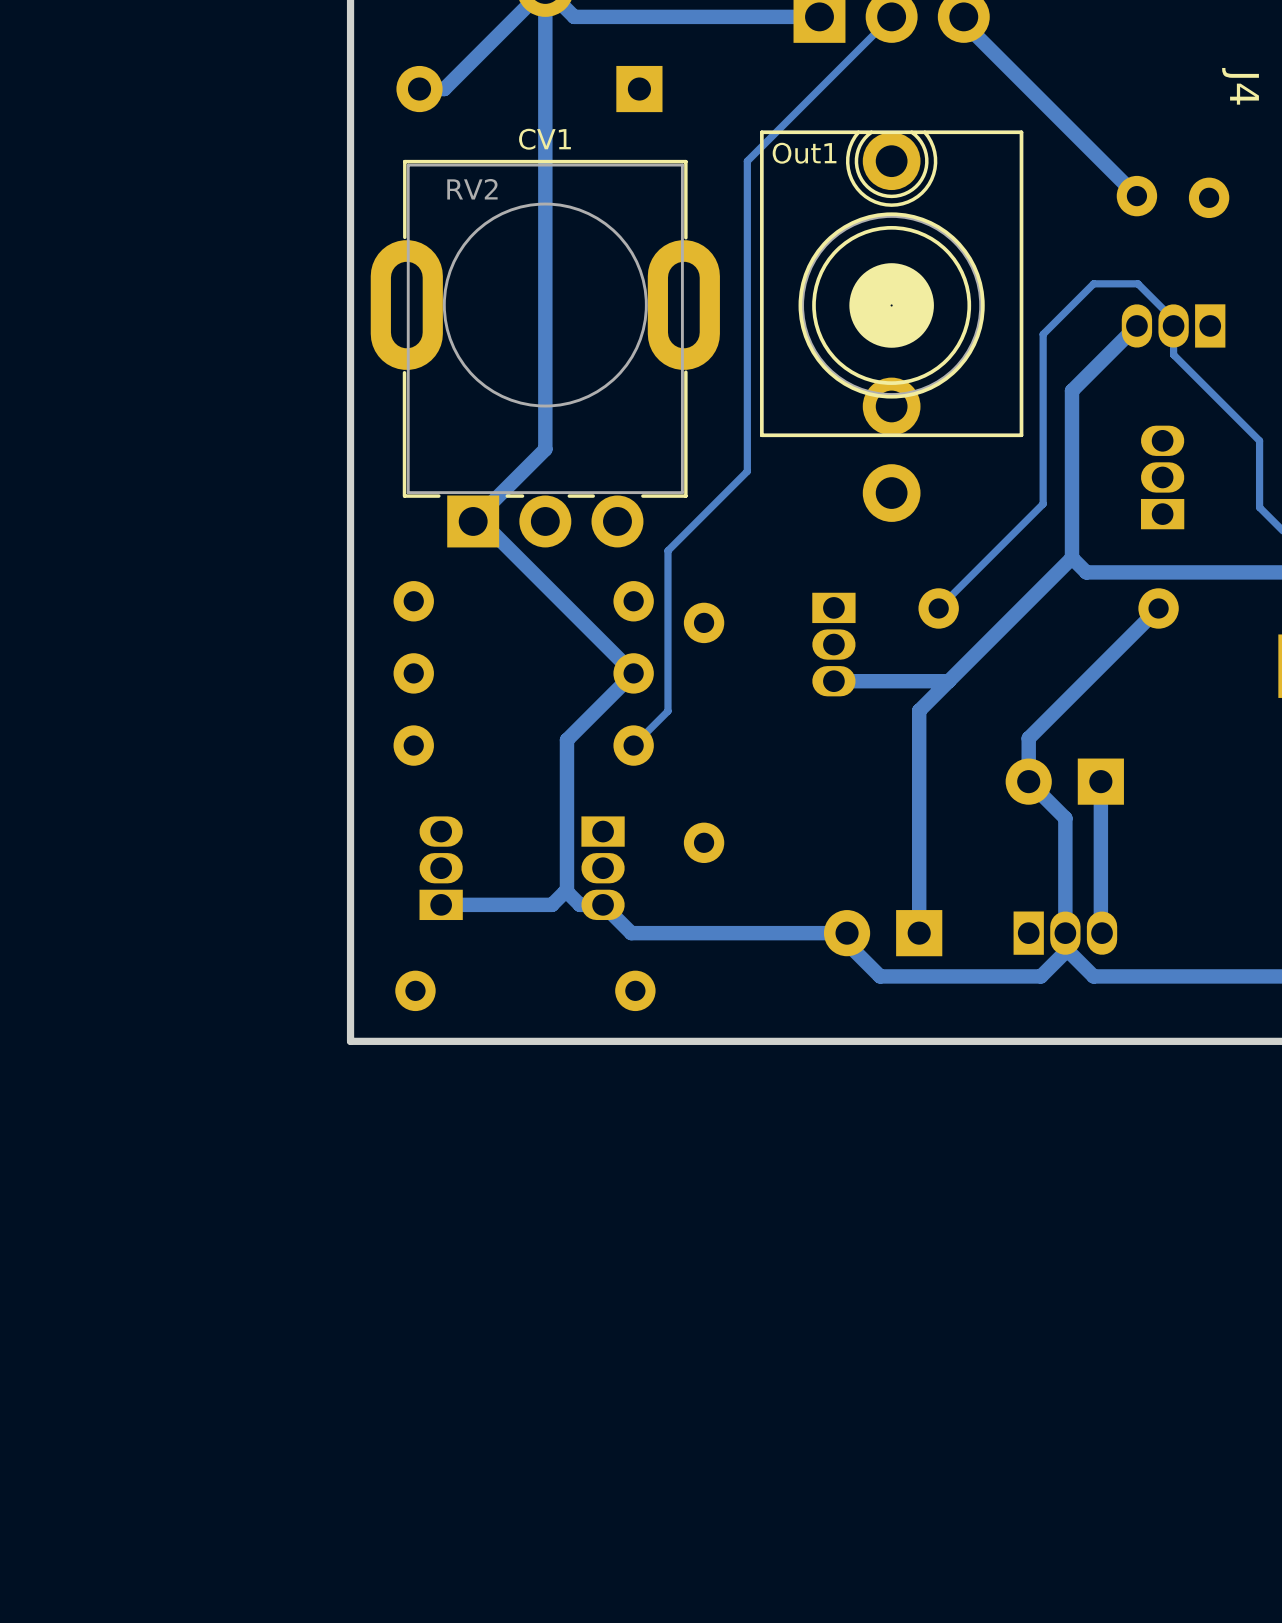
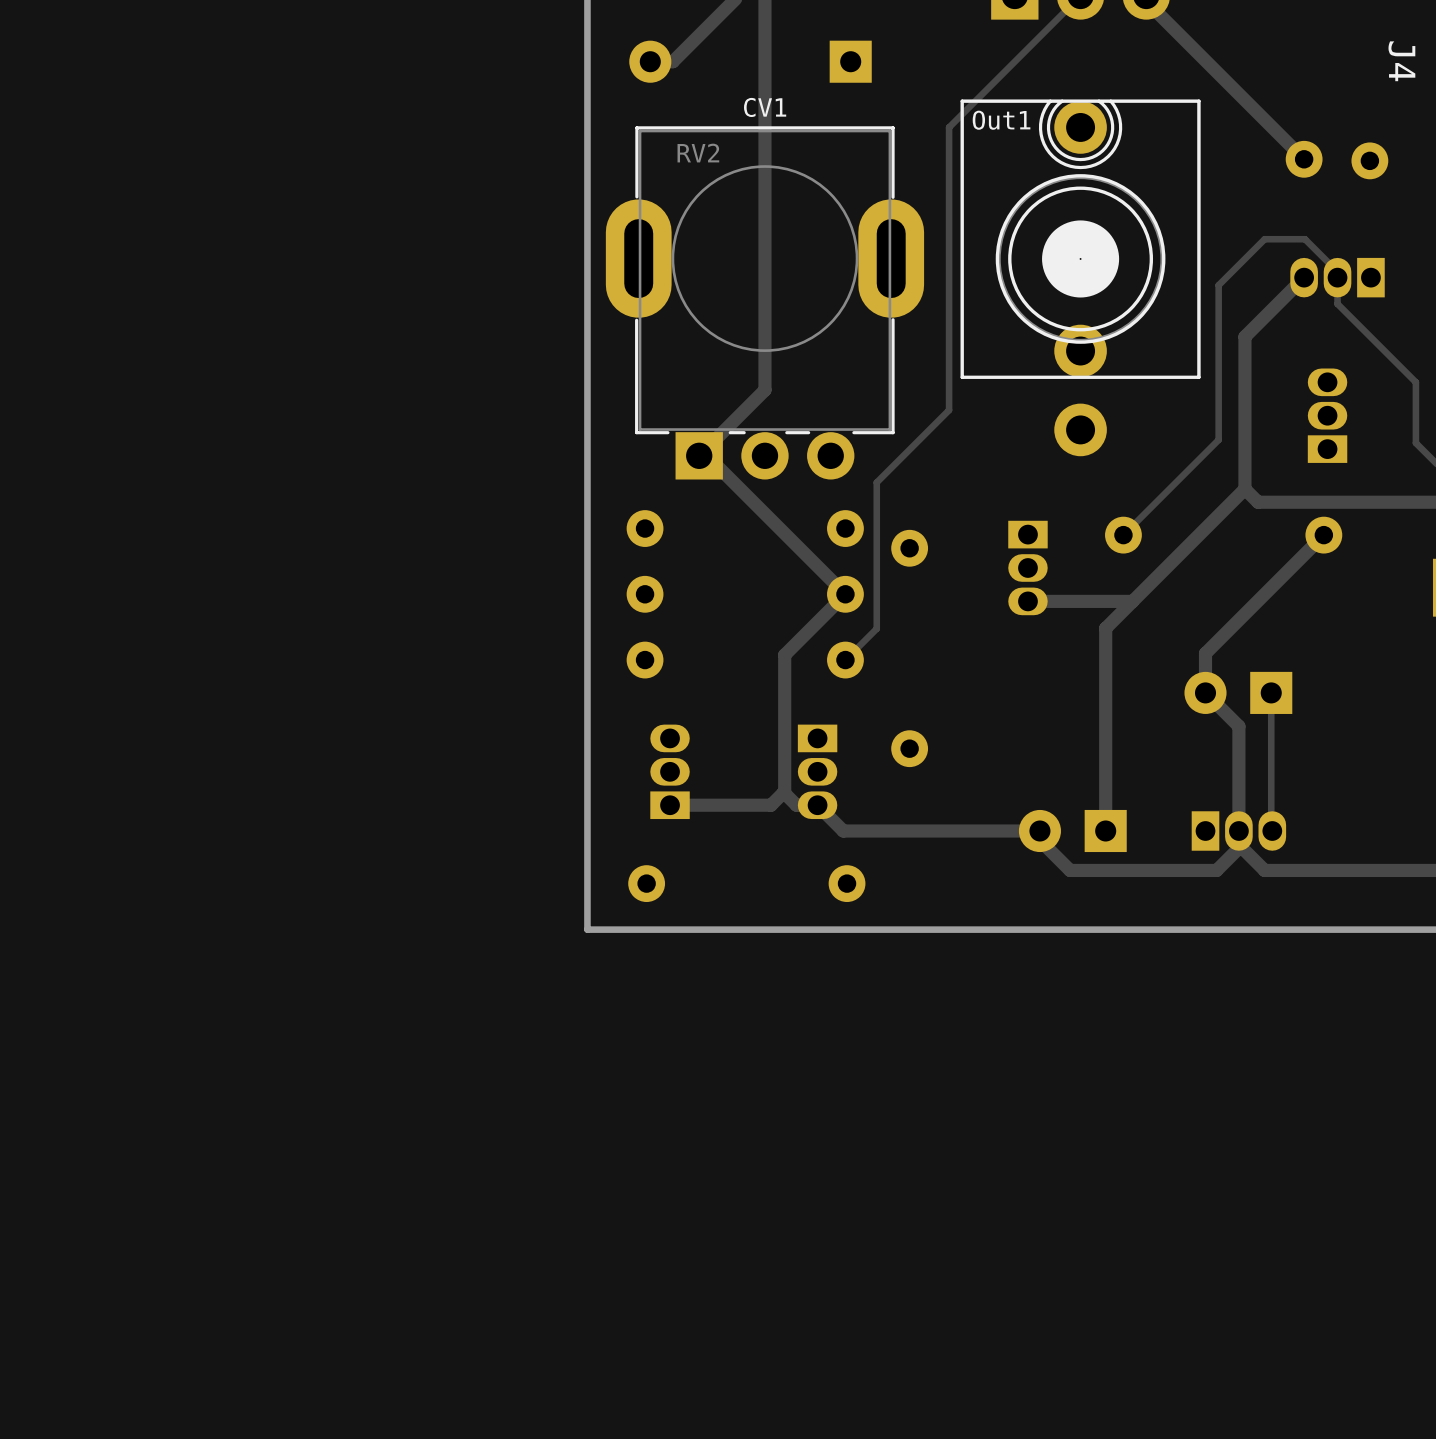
track width: thick (1100, 781) (1102, 933) -> thin (1271, 692) (1272, 831)

